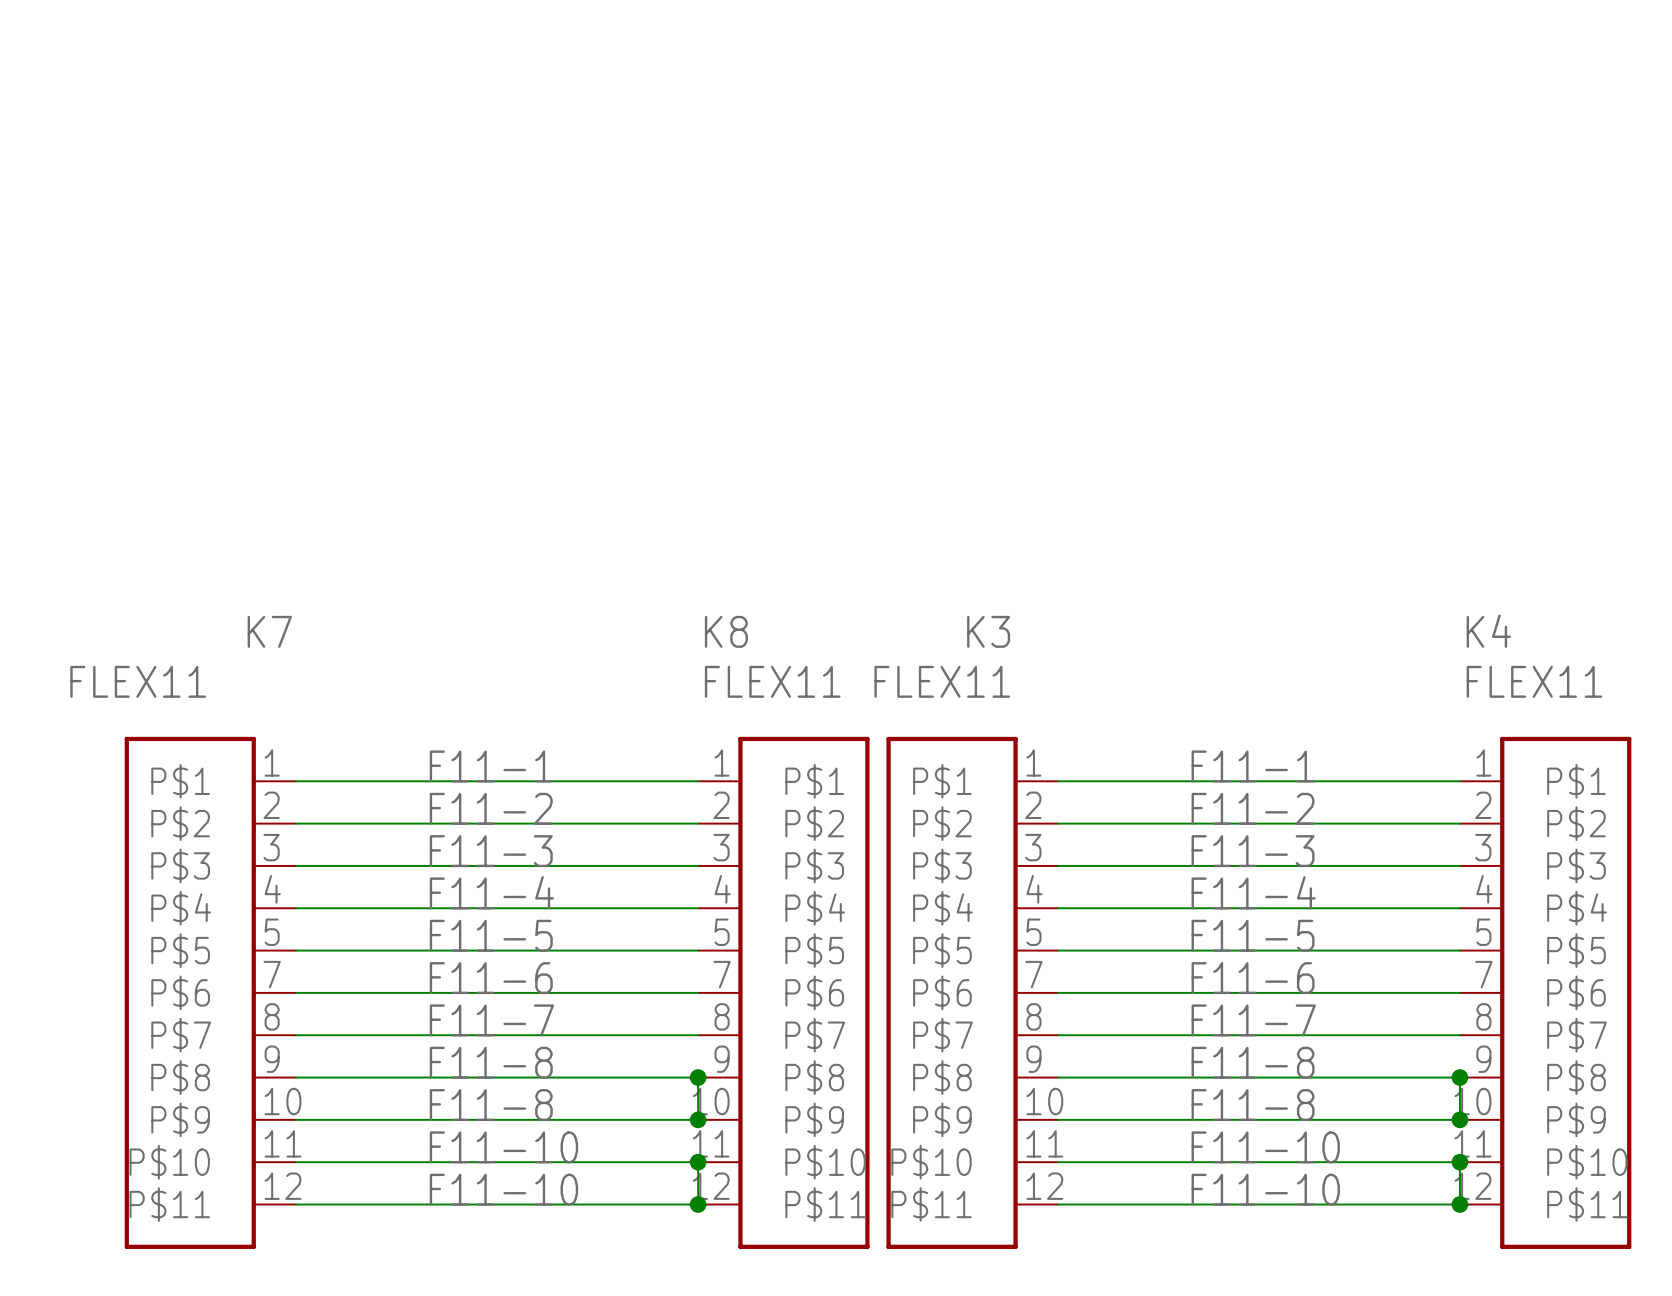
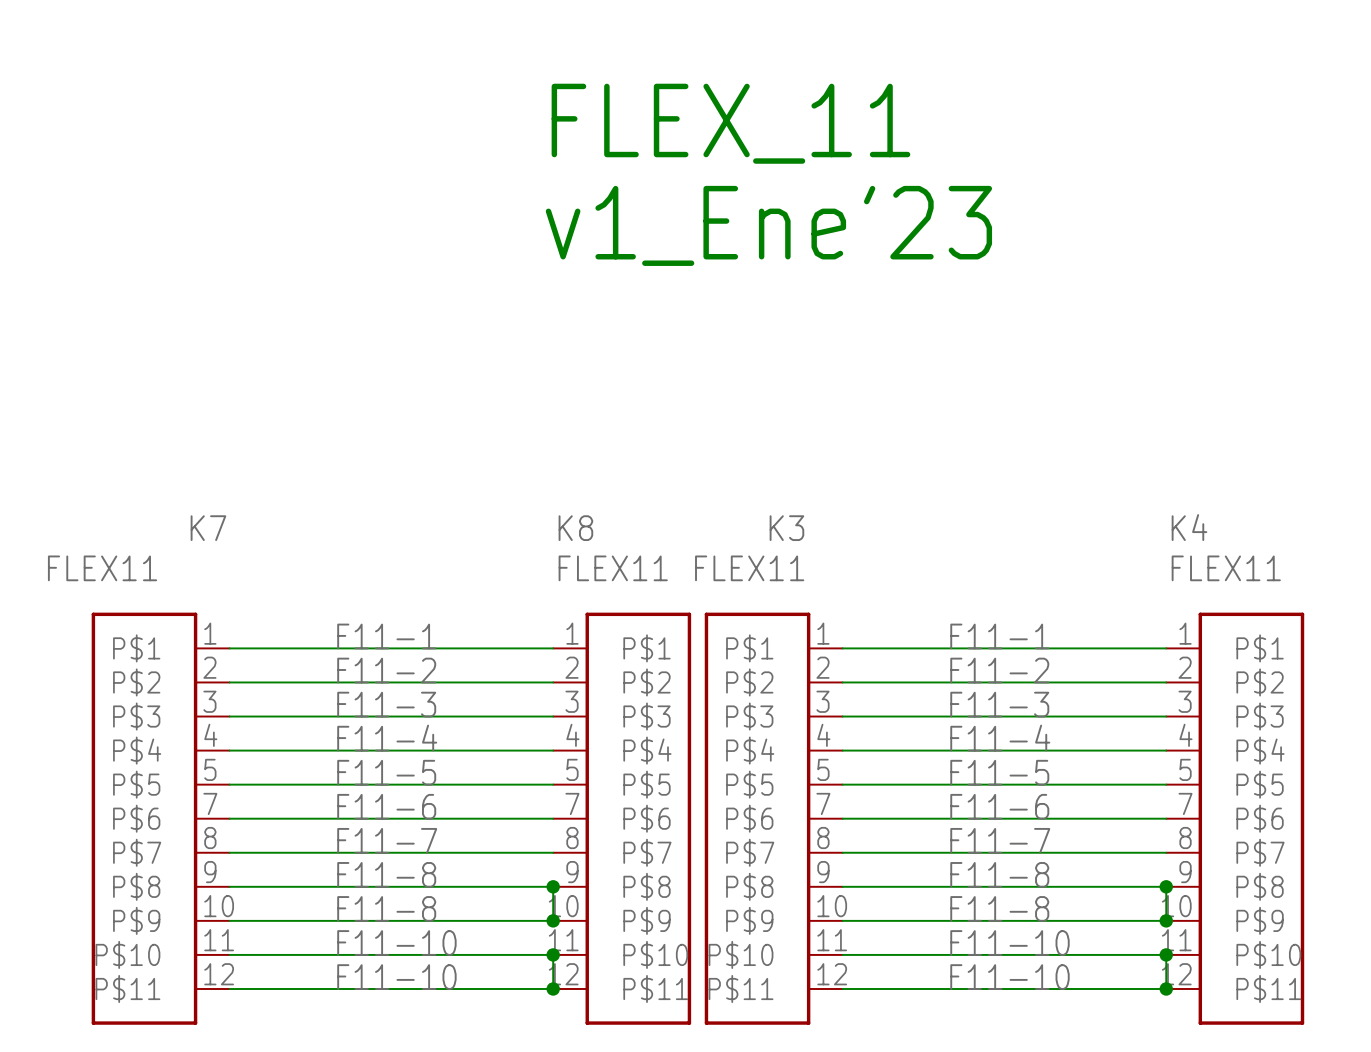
text: none -> FLEX_11 (730, 123)
text: none -> v1_Ene'23 (768, 225)

